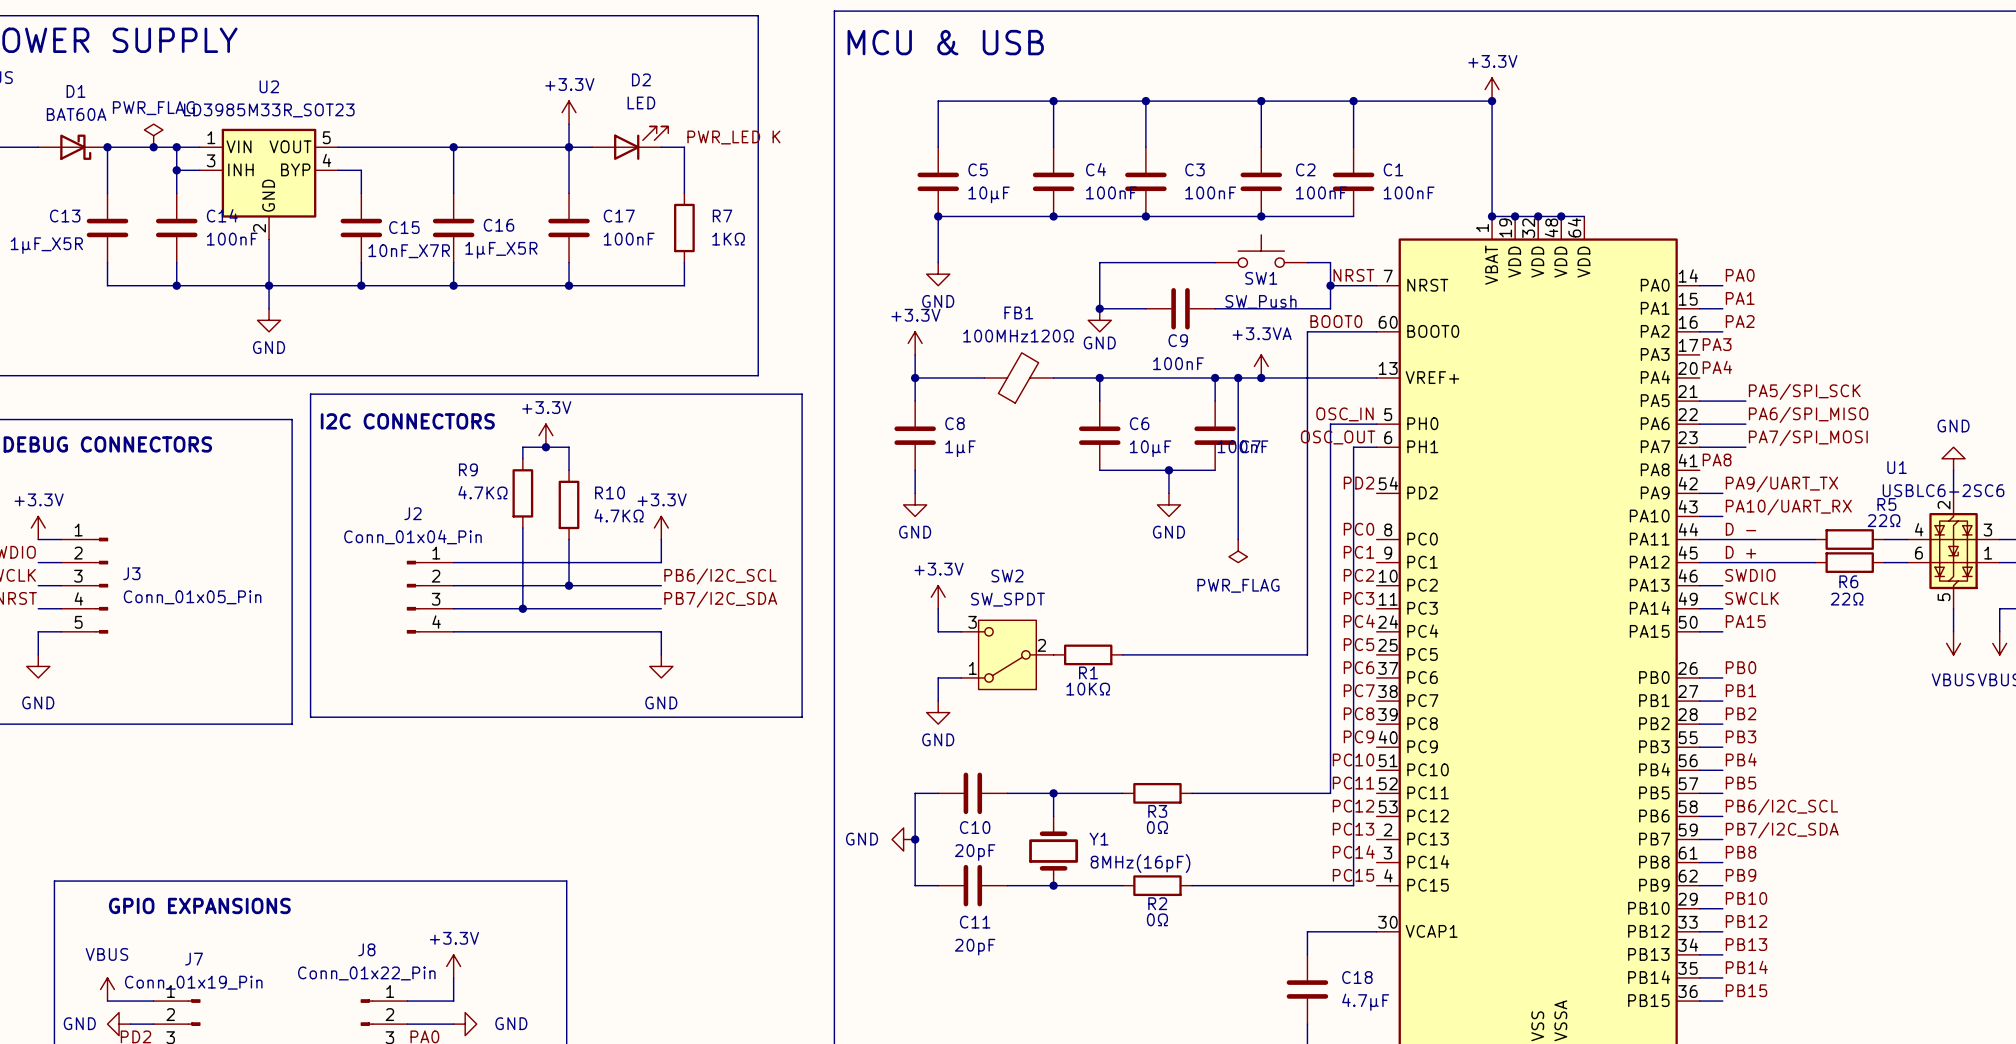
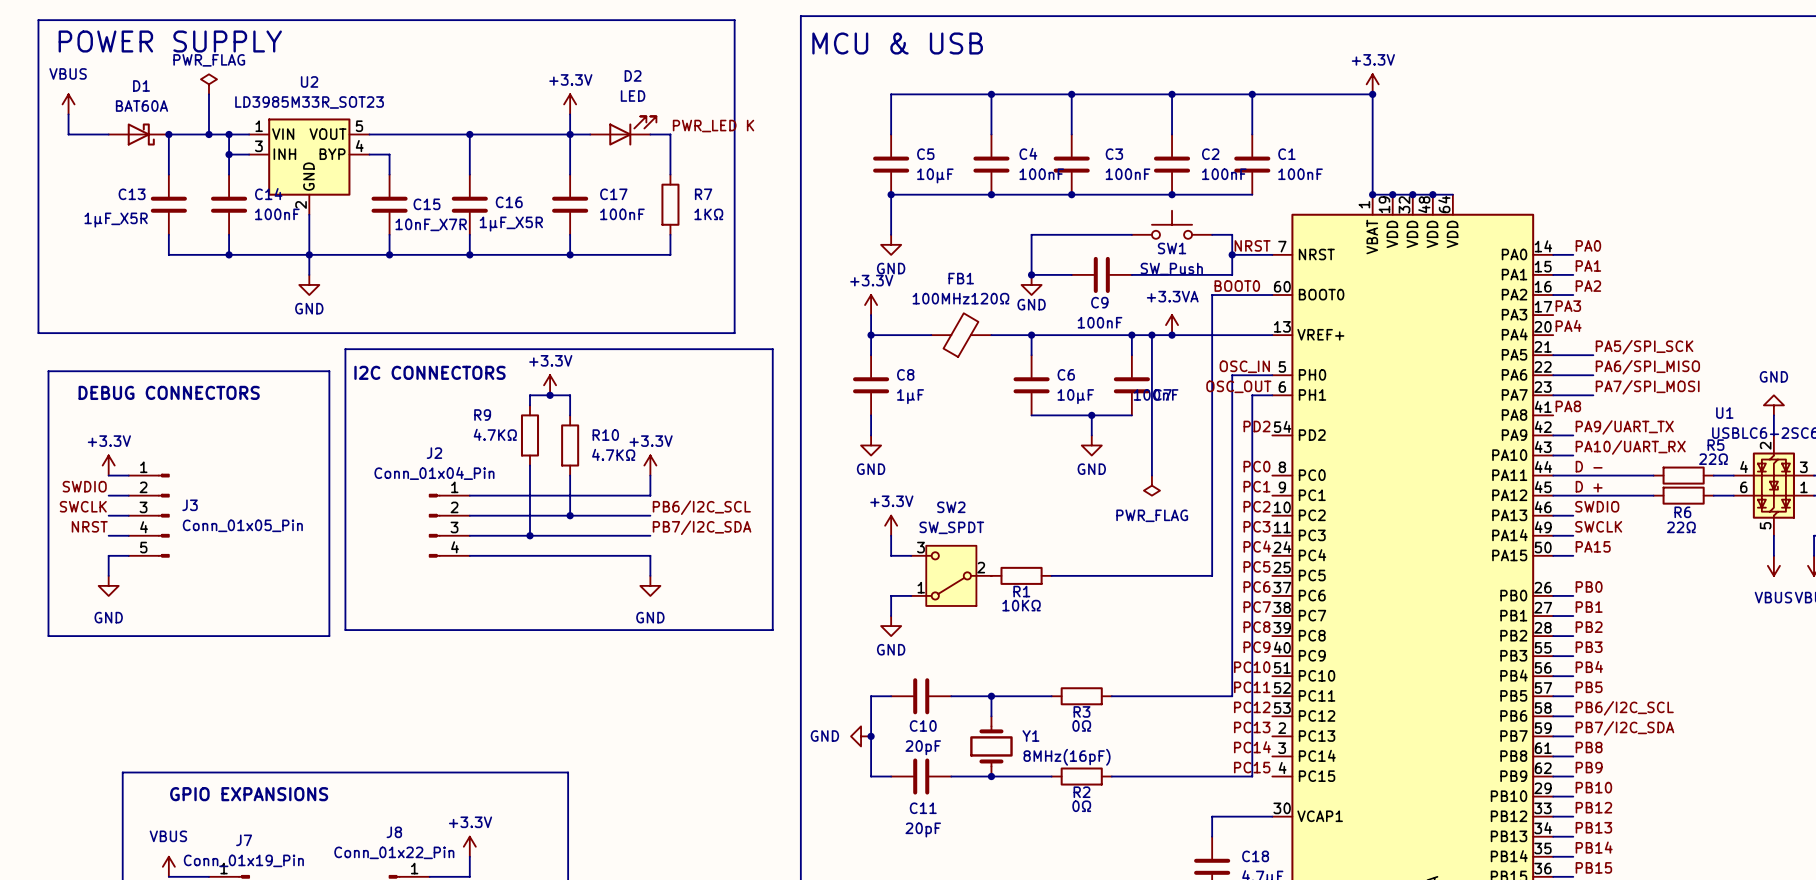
wire: none -> (208, 94) (208, 134)
power symbol position: PWR_FLAG (153, 135) -> PWR_FLAG (208, 84)

